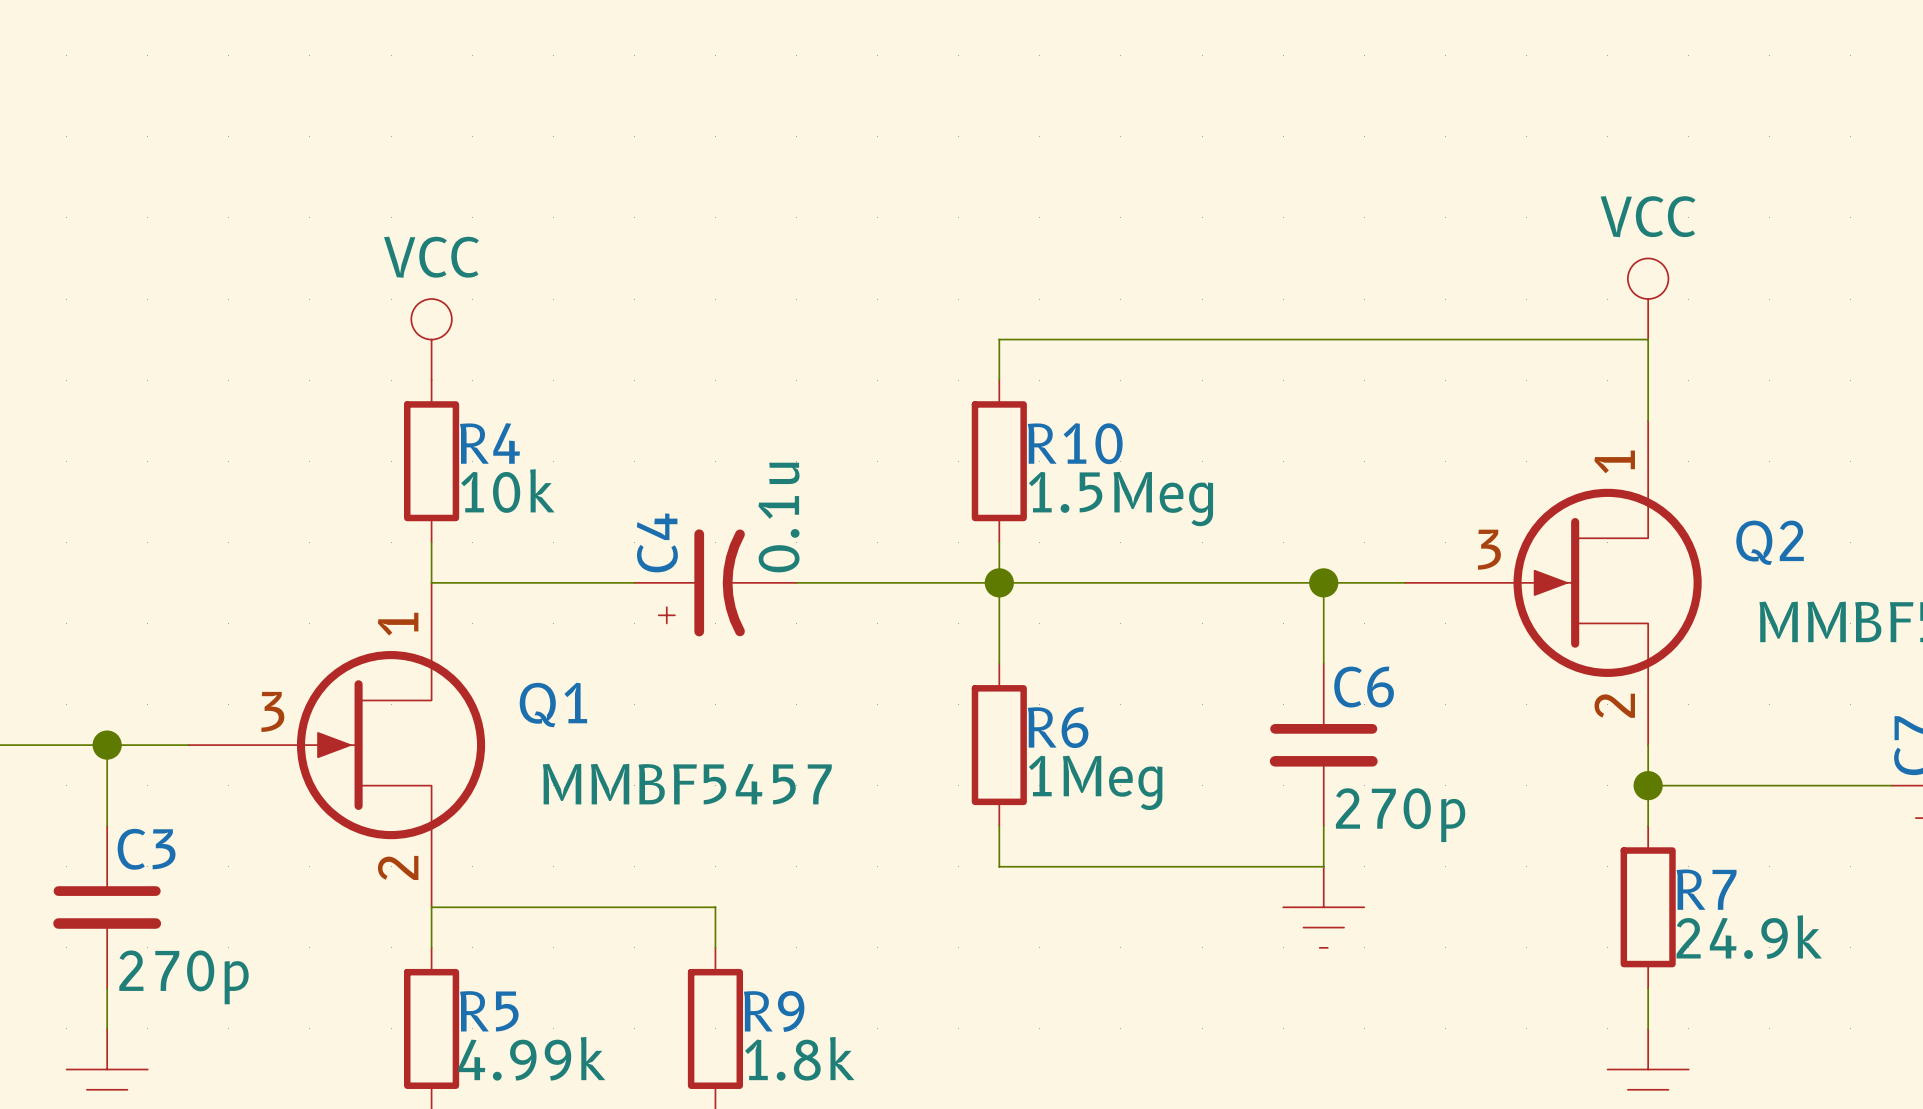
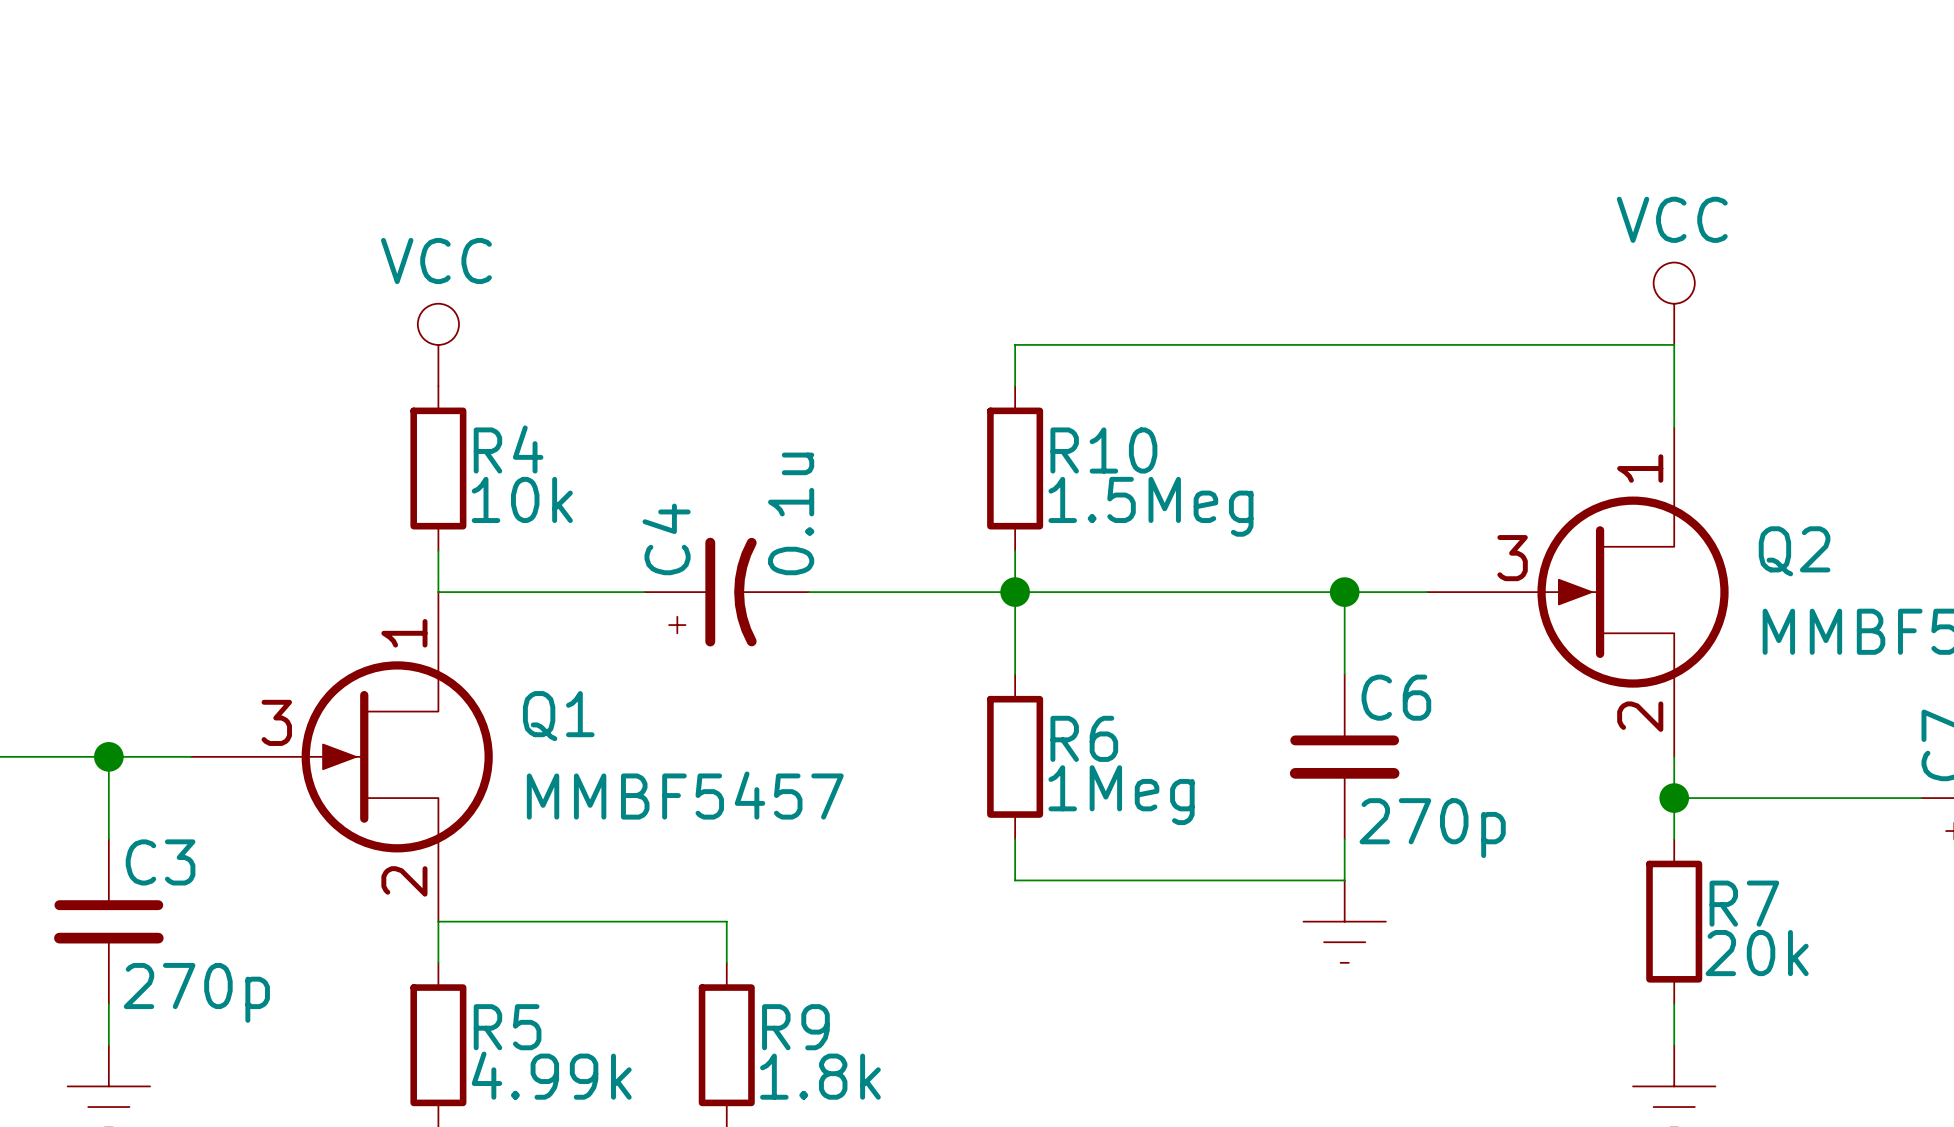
R7 value: 24.9k (1749, 937) -> 20k (1757, 953)

